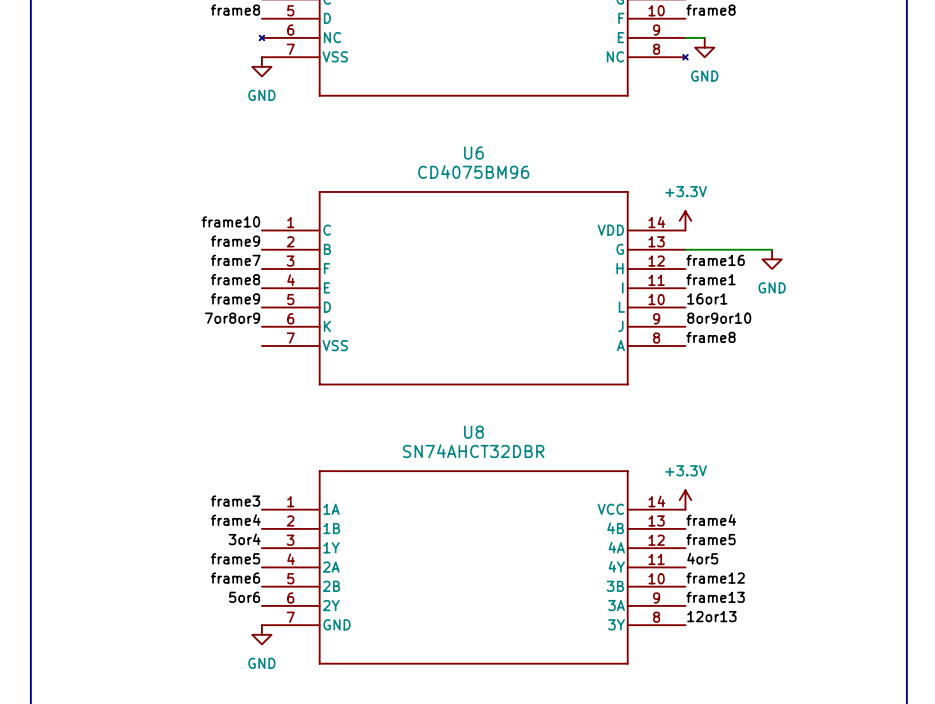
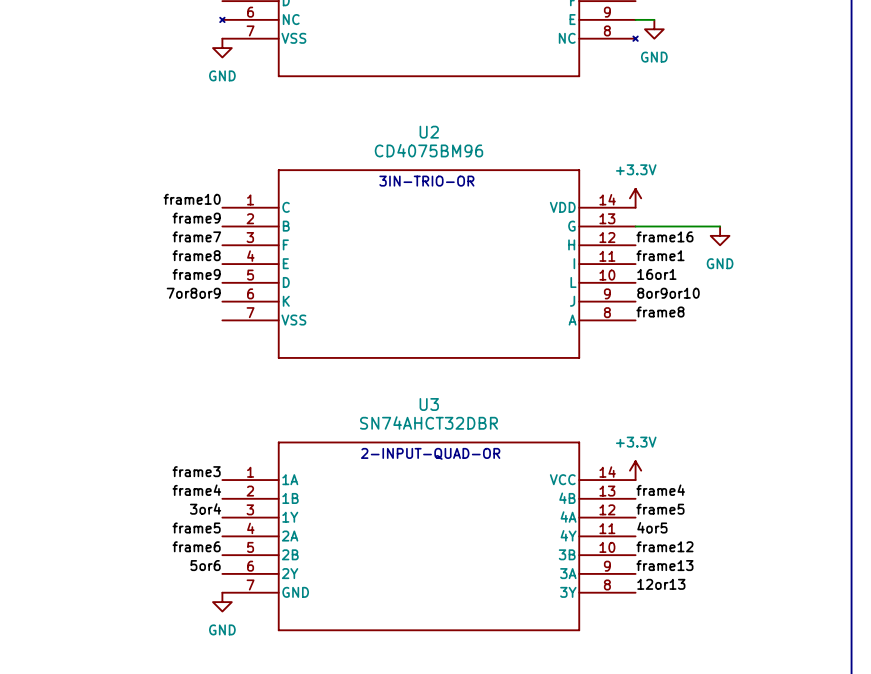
U6 name: U6 (473, 153) -> U2 (429, 132)
text: none -> 3IN-TRIO-OR (426, 181)
U8 name: U8 (473, 432) -> U3 (429, 404)
text: none -> 2-INPUT-QUAD-OR (430, 453)

